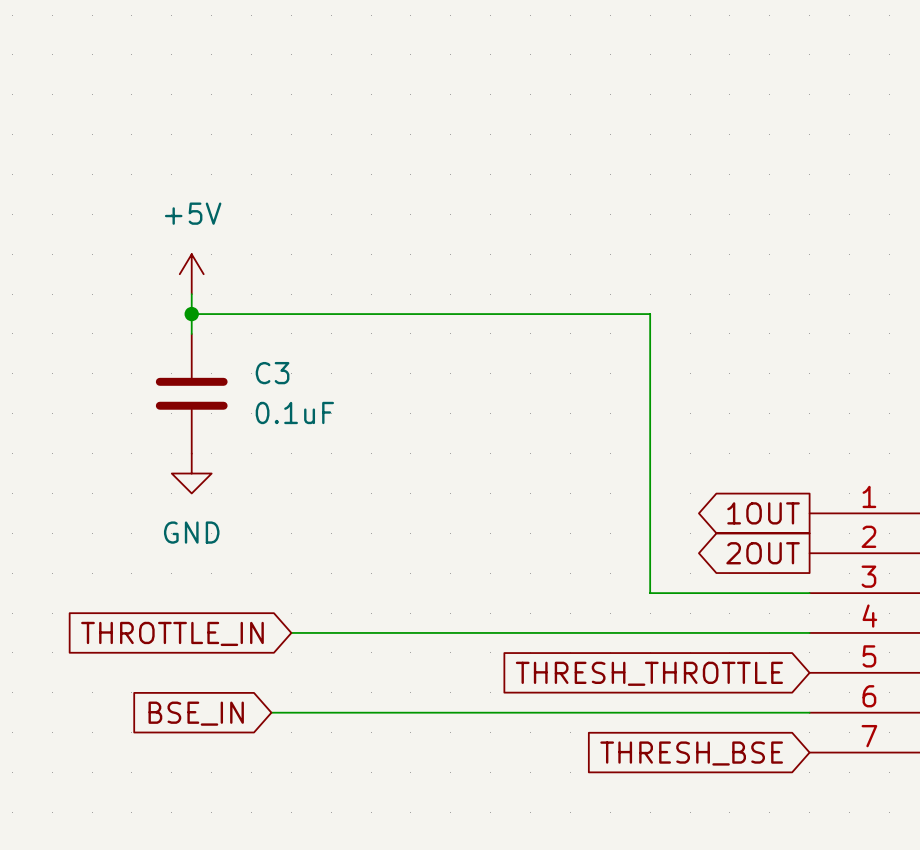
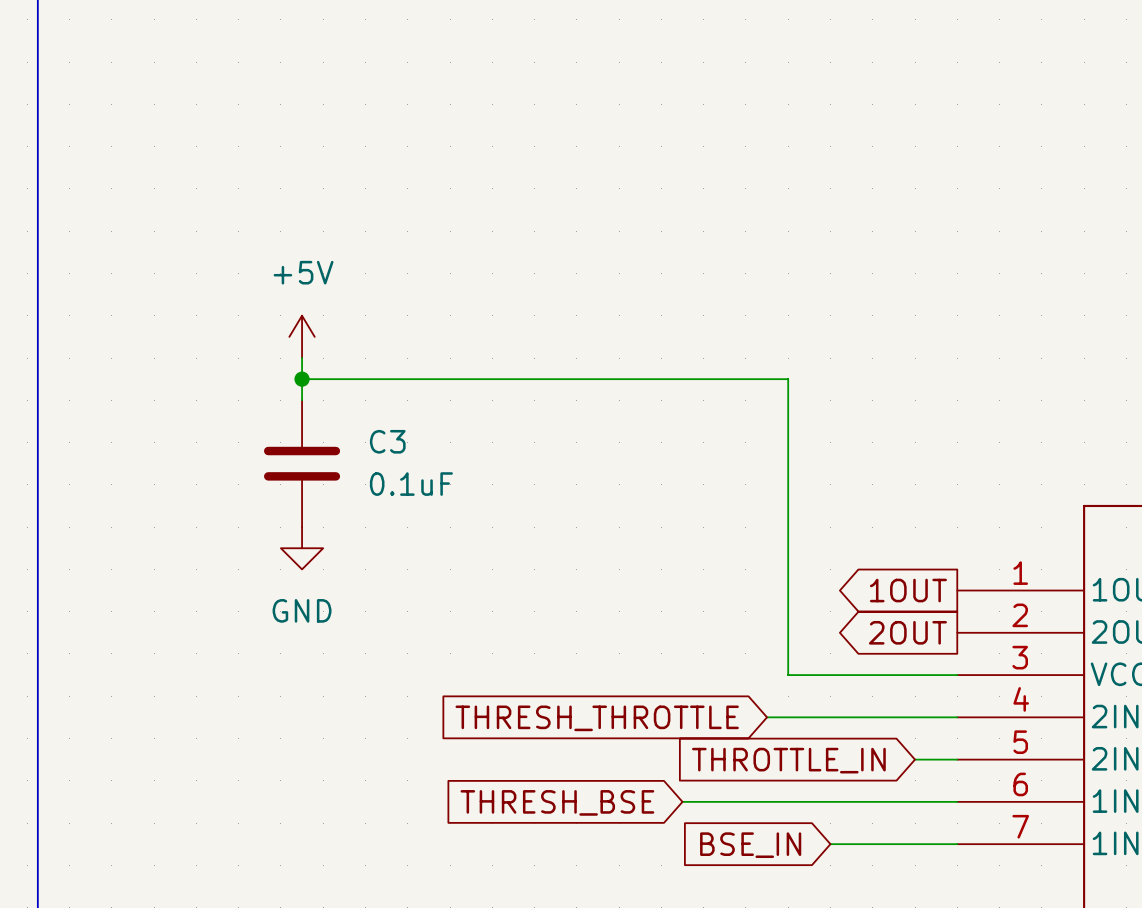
wire: (291, 632) (630, 632) -> none
global label: THROTTLE_IN (172, 633) -> none
wire: none -> (915, 759) (957, 759)
global label position: THRESH_THROTTLE (649, 673) -> THRESH_THROTTLE (597, 718)
global label: none -> THROTTLE_IN (788, 760)
wire: (271, 712) (550, 712) -> none
global label: BSE_IN (196, 713) -> none
wire: none -> (830, 844) (957, 844)
global label: none -> BSE_IN (750, 845)
global label position: THRESH_BSE (691, 753) -> THRESH_BSE (557, 802)

